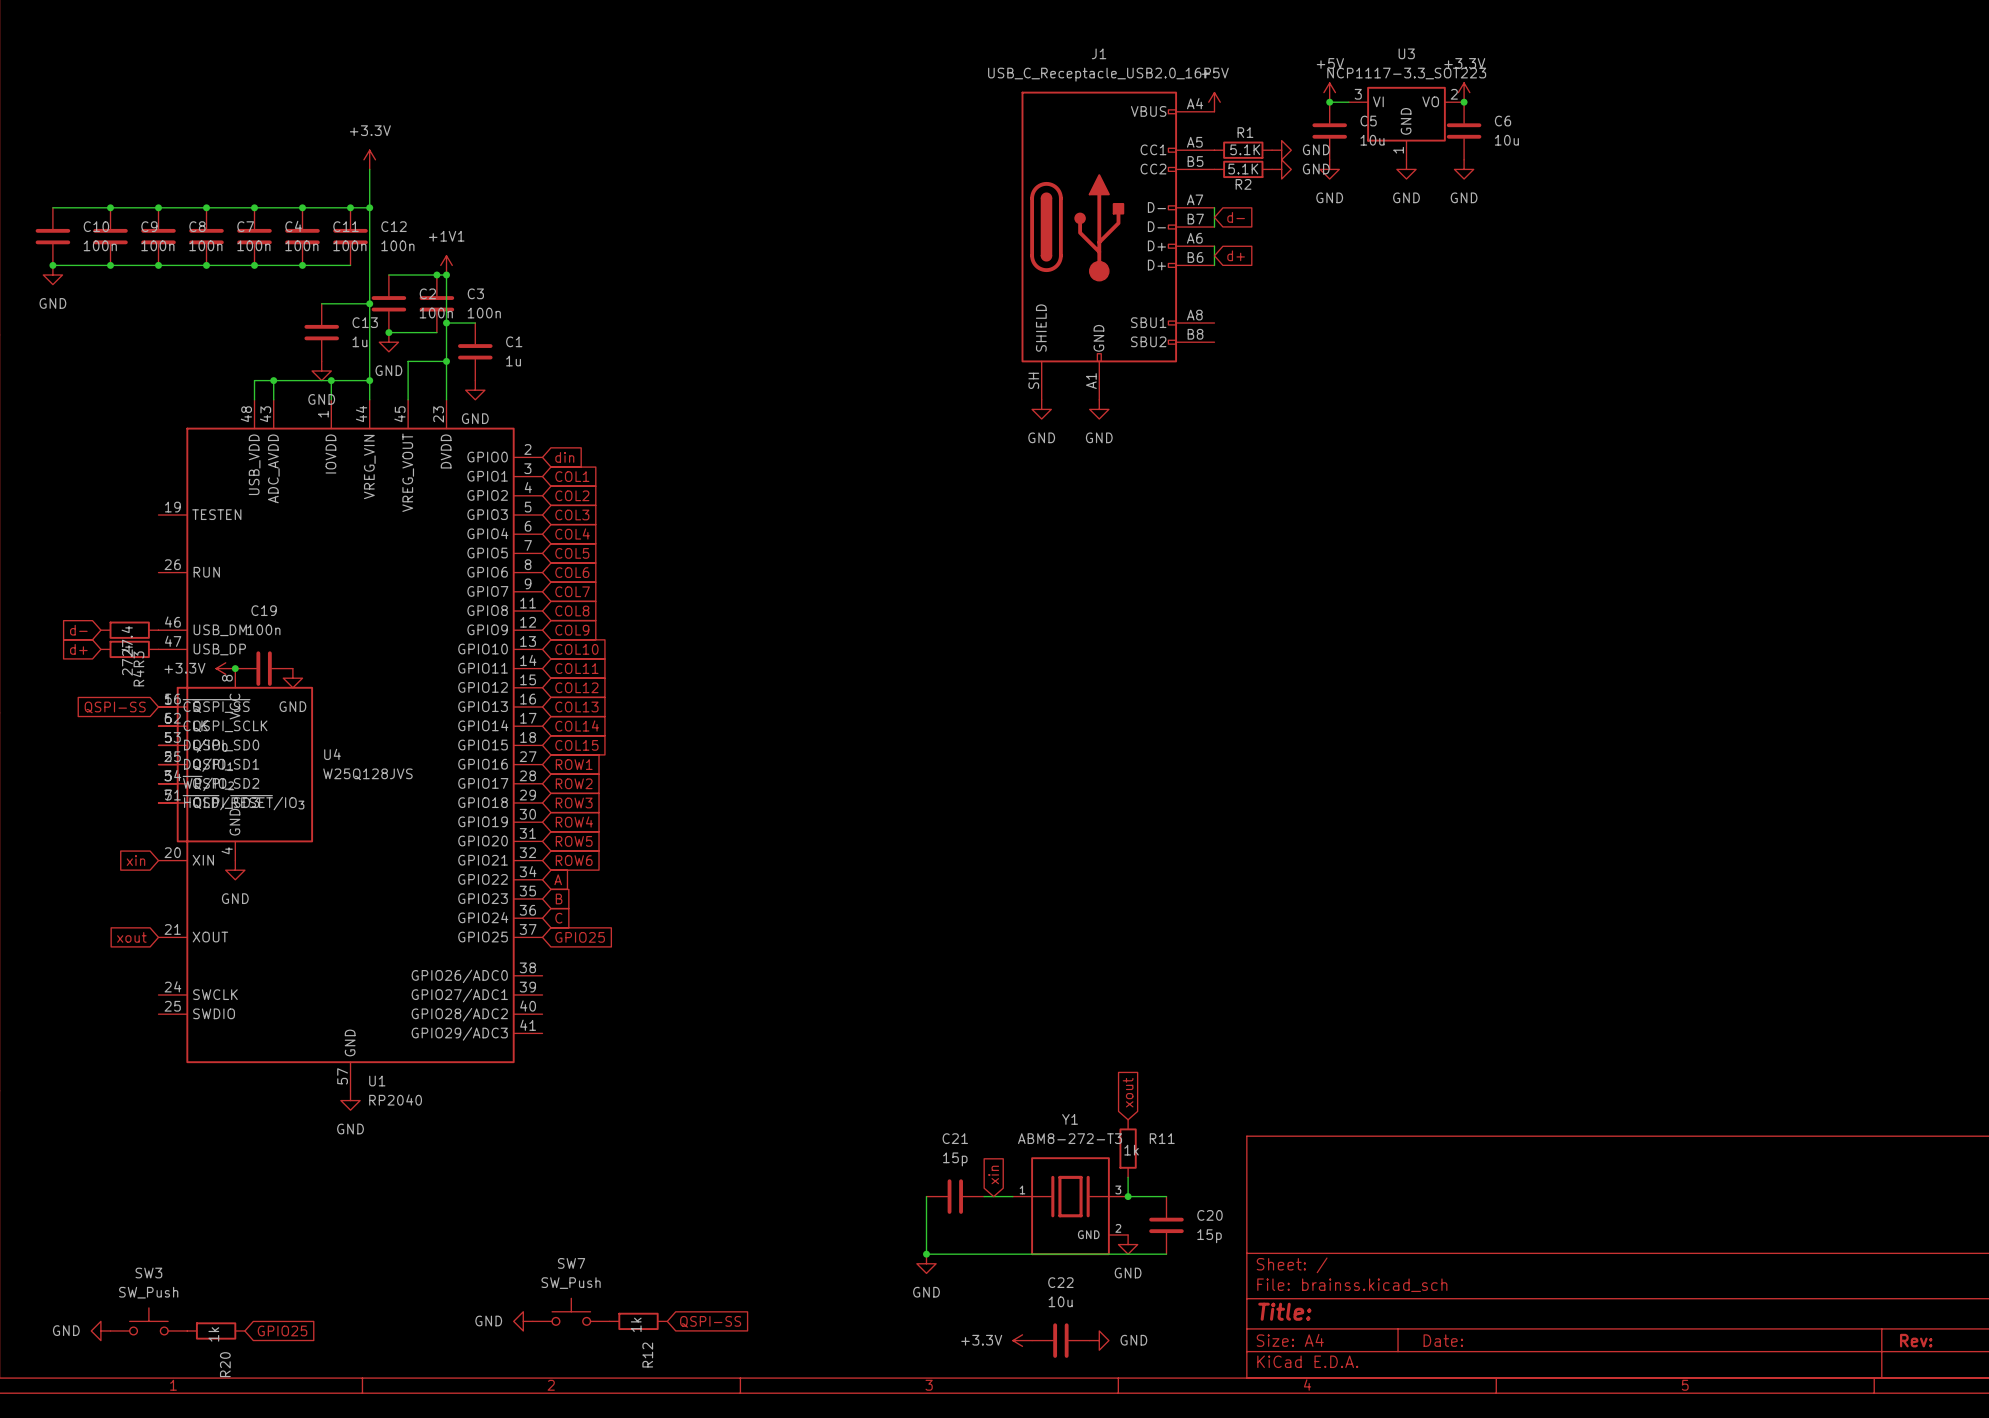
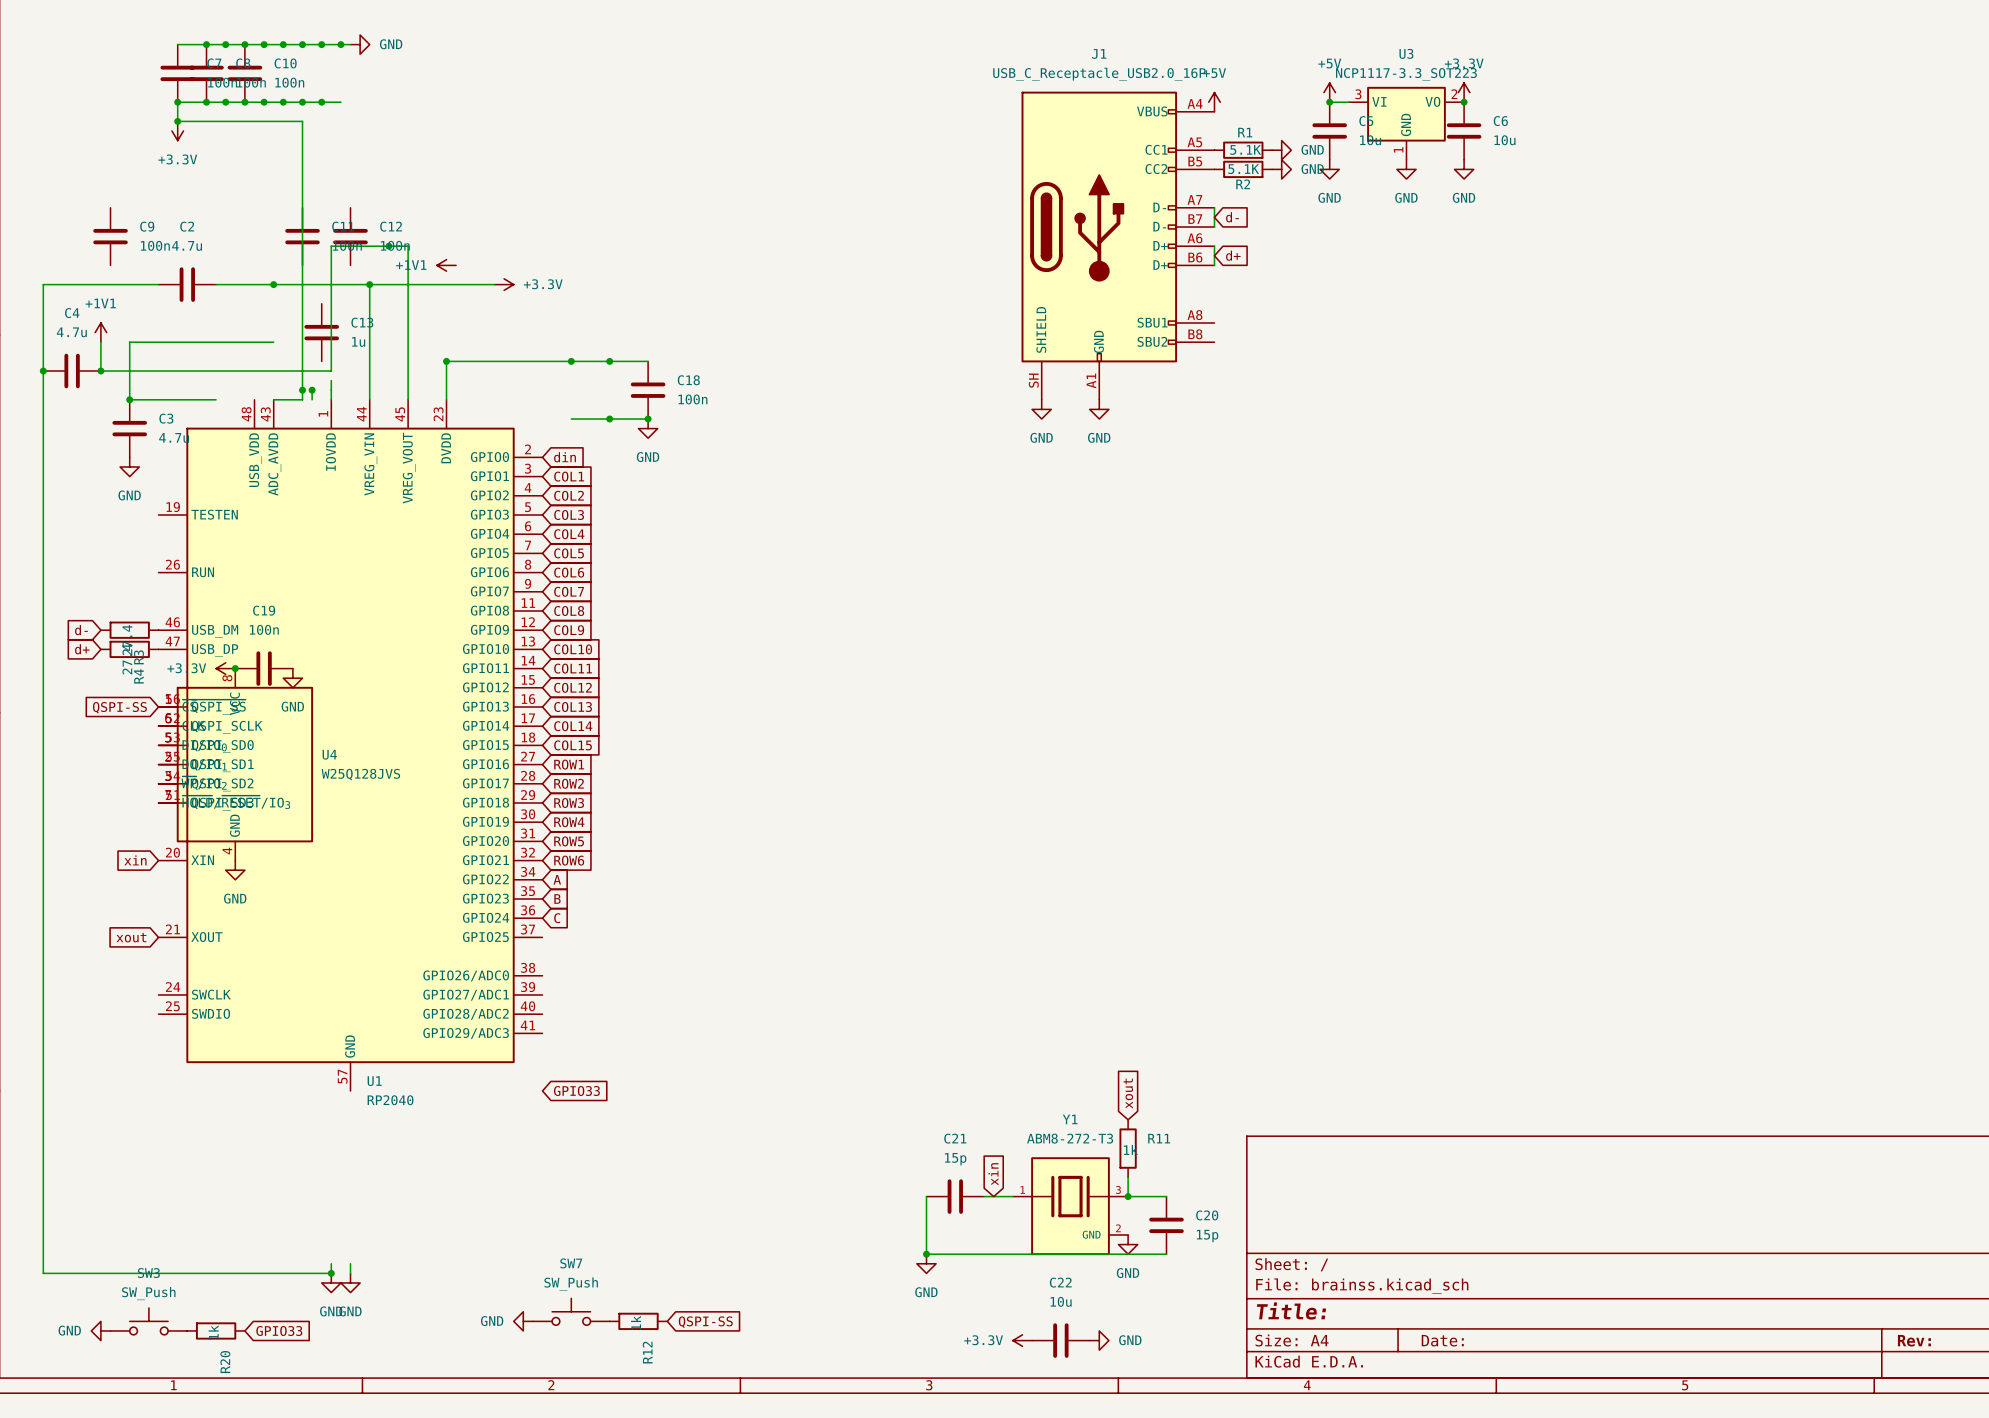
wire: none -> (177, 44) (350, 44)
junction: none -> (206, 44)
junction: none -> (225, 44)
junction: none -> (244, 44)
junction: none -> (264, 44)
junction: none -> (283, 44)
junction: none -> (302, 44)
junction: none -> (321, 44)
junction: none -> (340, 44)
power symbol: none -> GND (360, 44)
junction: none -> (177, 102)
junction: none -> (206, 102)
junction: none -> (225, 102)
junction: none -> (244, 102)
junction: none -> (264, 102)
junction: none -> (283, 102)
junction: none -> (302, 102)
junction: none -> (321, 102)
junction: none -> (177, 121)
power symbol: none -> +3.3V (177, 131)
power symbol: +3.3V (369, 159) -> none
wire: (369, 169) (369, 284) -> none
wire: (52, 207) (369, 207) -> none
junction: (110, 207) -> none
junction: (158, 207) -> none
junction: (206, 207) -> none
junction: (254, 207) -> none
junction: (302, 207) -> none
junction: (350, 207) -> none
junction: (369, 207) -> none
C4 name position: C4 (293, 226) -> C4 (72, 313)
C10 position: (52, 236) -> (244, 73)
C8 position: (158, 236) -> (206, 73)
C7 position: (206, 236) -> (177, 73)
C4 rotation: 0° (254, 236) -> 90° clockwise (72, 371)
C4 position: (254, 236) -> (72, 371)
C4 value: 100n (301, 245) -> 4.7u (71, 332)
junction: none -> (388, 246)
wire: (52, 265) (350, 265) -> none
junction: (52, 265) -> none
junction: (110, 265) -> none
junction: (158, 265) -> none
junction: (206, 265) -> none
junction: (254, 265) -> none
junction: (302, 265) -> none
power symbol rotation: 0° (446, 265) -> 90° counterclockwise (446, 265)
power symbol: GND (52, 275) -> none
wire: (388, 275) (446, 275) (446, 361) (408, 361) -> (100, 342) (100, 371) (331, 371) (331, 246) (408, 246) (408, 361)
junction: (436, 275) -> none
junction: (446, 275) -> none
wire: none -> (158, 284) (43, 284) (43, 1273) (331, 1273) (331, 1263)
wire: none -> (216, 284) (494, 284)
junction: none -> (273, 284)
power symbol: none -> +3.3V (504, 284)
C2 name position: C2 (427, 293) -> C2 (187, 226)
wire: (321, 303) (369, 303) -> none
junction position: (369, 303) -> (369, 284)
C2 rotation: 0° (388, 303) -> 90° clockwise (187, 284)
C2 position: (388, 303) -> (187, 284)
C3 position: (436, 303) -> (129, 428)
C2 value: 100n (436, 313) -> 4.7u (187, 245)
C3 value: 100n (484, 313) -> 4.7u (174, 437)
wire: (446, 323) (475, 323) -> none
junction: (446, 323) -> none
power symbol: none -> +1V1 (100, 332)
wire: (388, 332) (436, 332) -> none
junction: (388, 332) -> none
wire: none -> (273, 342) (129, 342) (129, 399) (216, 399)
power symbol: GND (388, 342) -> none
C1: 1u (475, 351) -> none
wire: none -> (446, 361) (648, 361)
junction: none -> (571, 361)
junction: none -> (609, 361)
junction: none -> (43, 371)
junction: none -> (100, 371)
power symbol: GND (321, 371) -> none
wire: (273, 380) (273, 399) -> (340, 102) (177, 102) (177, 121) (302, 121) (302, 399) (273, 399)
junction: (273, 380) -> none
junction: (331, 380) -> none
wire: (369, 380) (254, 380) (254, 399) -> none
junction: (369, 380) -> none
junction: none -> (302, 390)
wire: none -> (312, 390) (312, 399)
junction: none -> (312, 390)
power symbol: GND (475, 390) -> none
C18: none -> 100n (648, 390)
junction: none -> (129, 399)
wire: none -> (571, 419) (648, 419)
junction: none -> (609, 419)
junction: none -> (648, 419)
power symbol: none -> GND (648, 428)
power symbol: none -> GND (129, 467)
global label: GPIO25 (580, 937) -> none
global label: none -> GPIO33 (576, 1090)
power symbol: GND (350, 1100) -> none
wire: none -> (350, 1263) (350, 1273)
junction: none -> (331, 1273)
power symbol: none -> GND (331, 1282)
power symbol: none -> GND (350, 1282)
global label: GPIO25 (282, 1330) -> GPIO33 (279, 1330)

